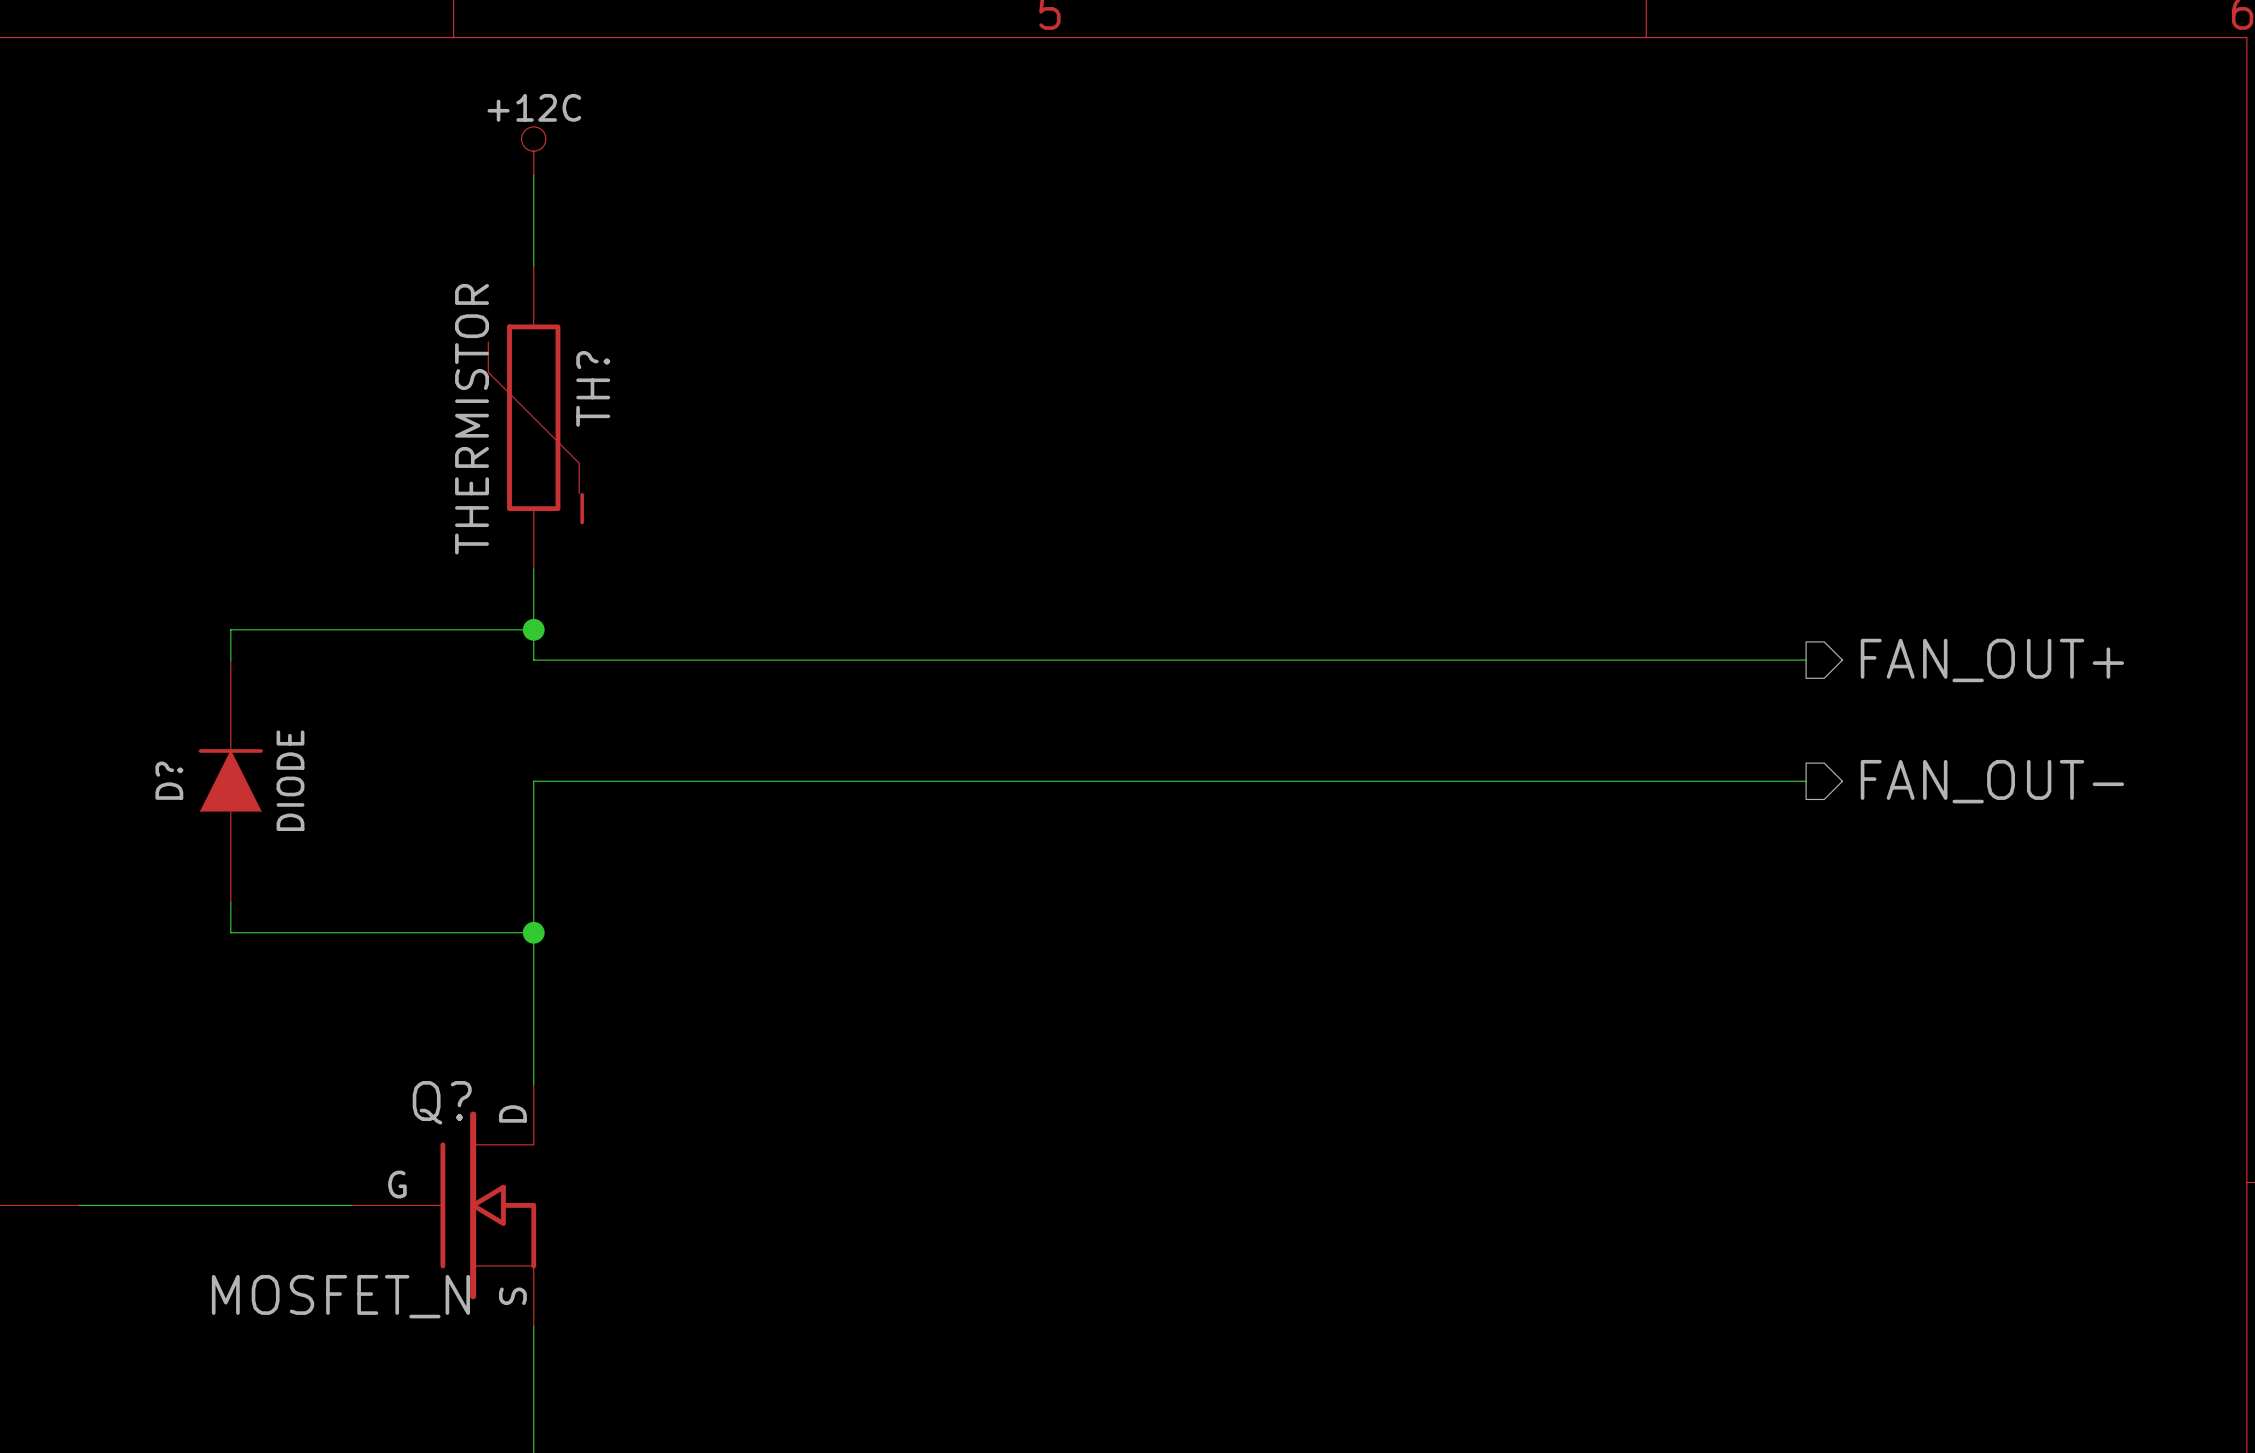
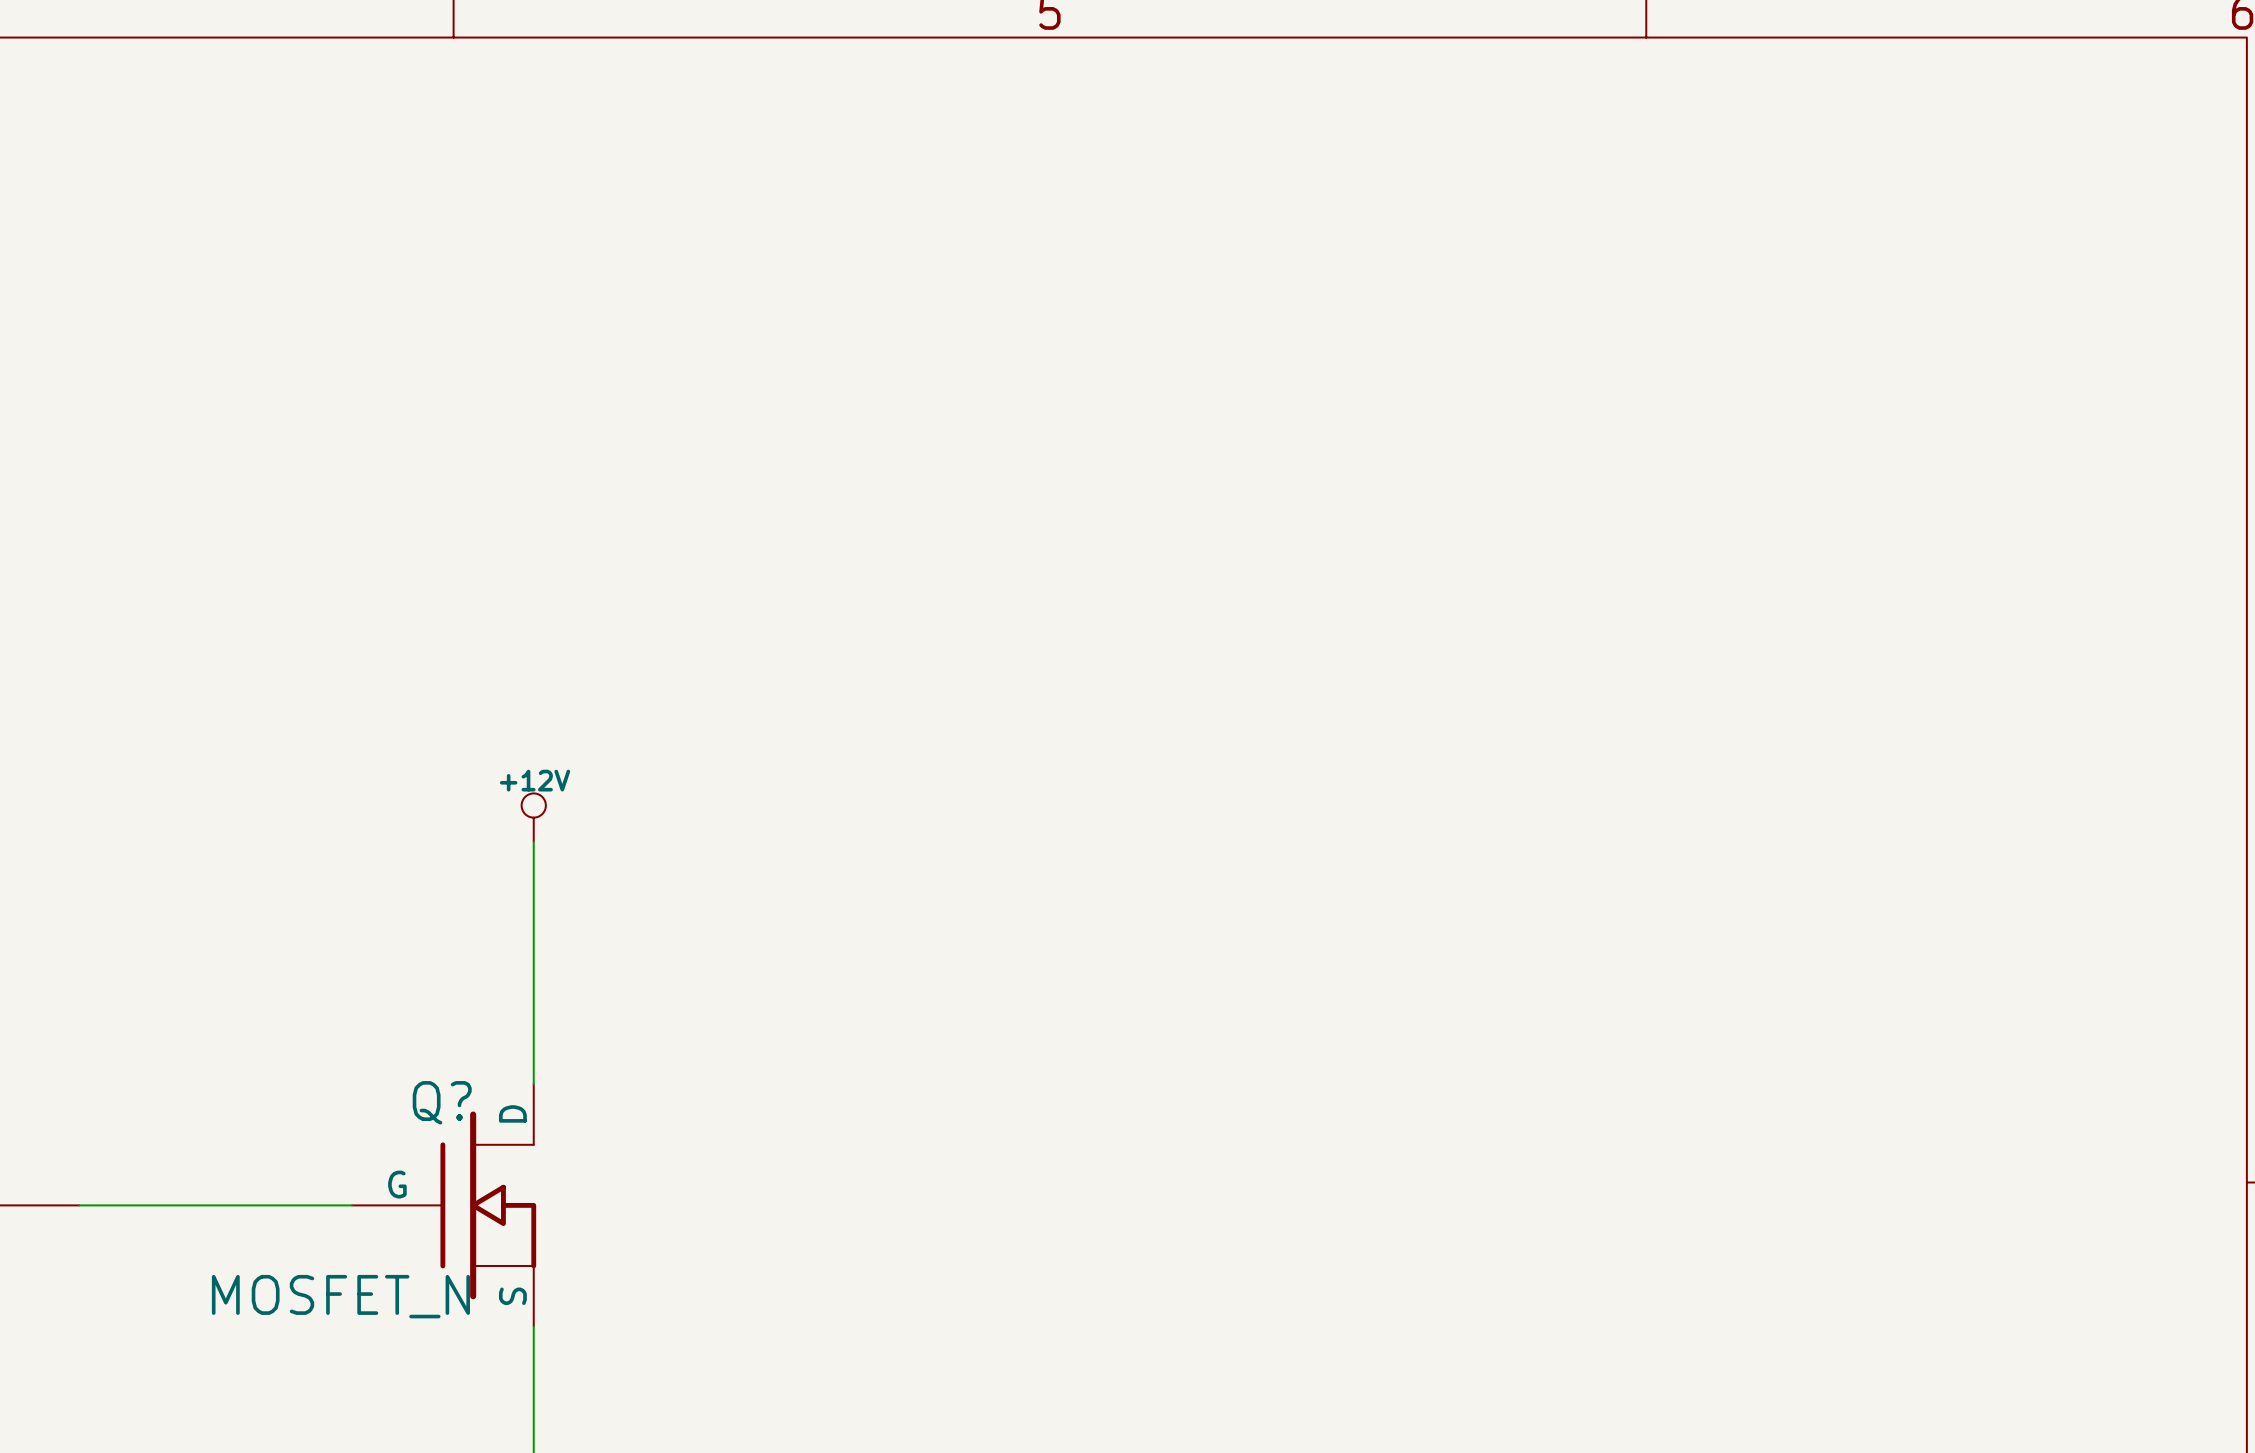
power symbol: +12C (533, 151) -> none
wire: (533, 175) (533, 266) -> none
TH?: THERMISTOR (533, 417) -> none
wire: (533, 569) (533, 660) (1806, 660) -> none
wire: (533, 629) (230, 629) (230, 660) -> none
junction: (533, 629) -> none
hierarchical label: FAN_OUT+ (1992, 660) -> none
D?: DIODE (230, 781) -> none
wire: (1806, 781) (533, 781) (533, 841) -> none
hierarchical label: FAN_OUT- (1992, 781) -> none
power symbol: none -> +12V (533, 817)
wire: (230, 902) (230, 932) (533, 932) -> none
junction: (533, 932) -> none

